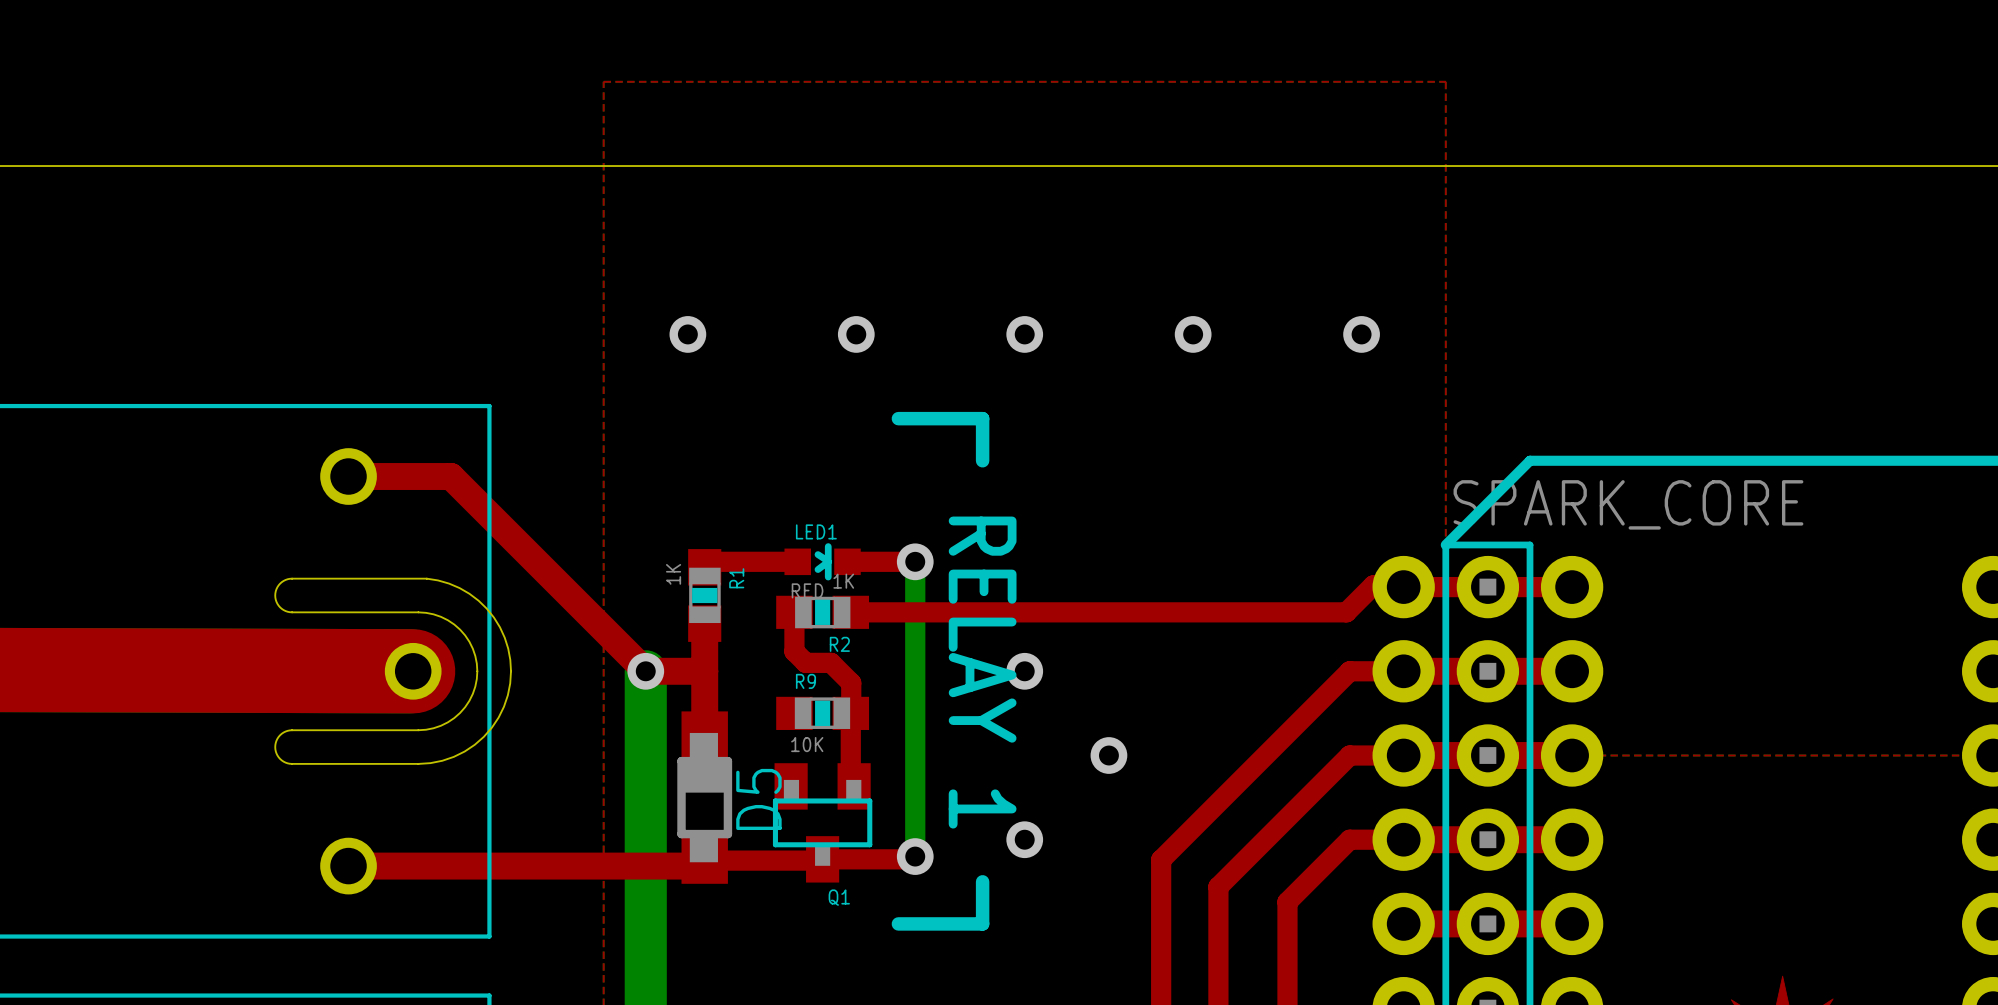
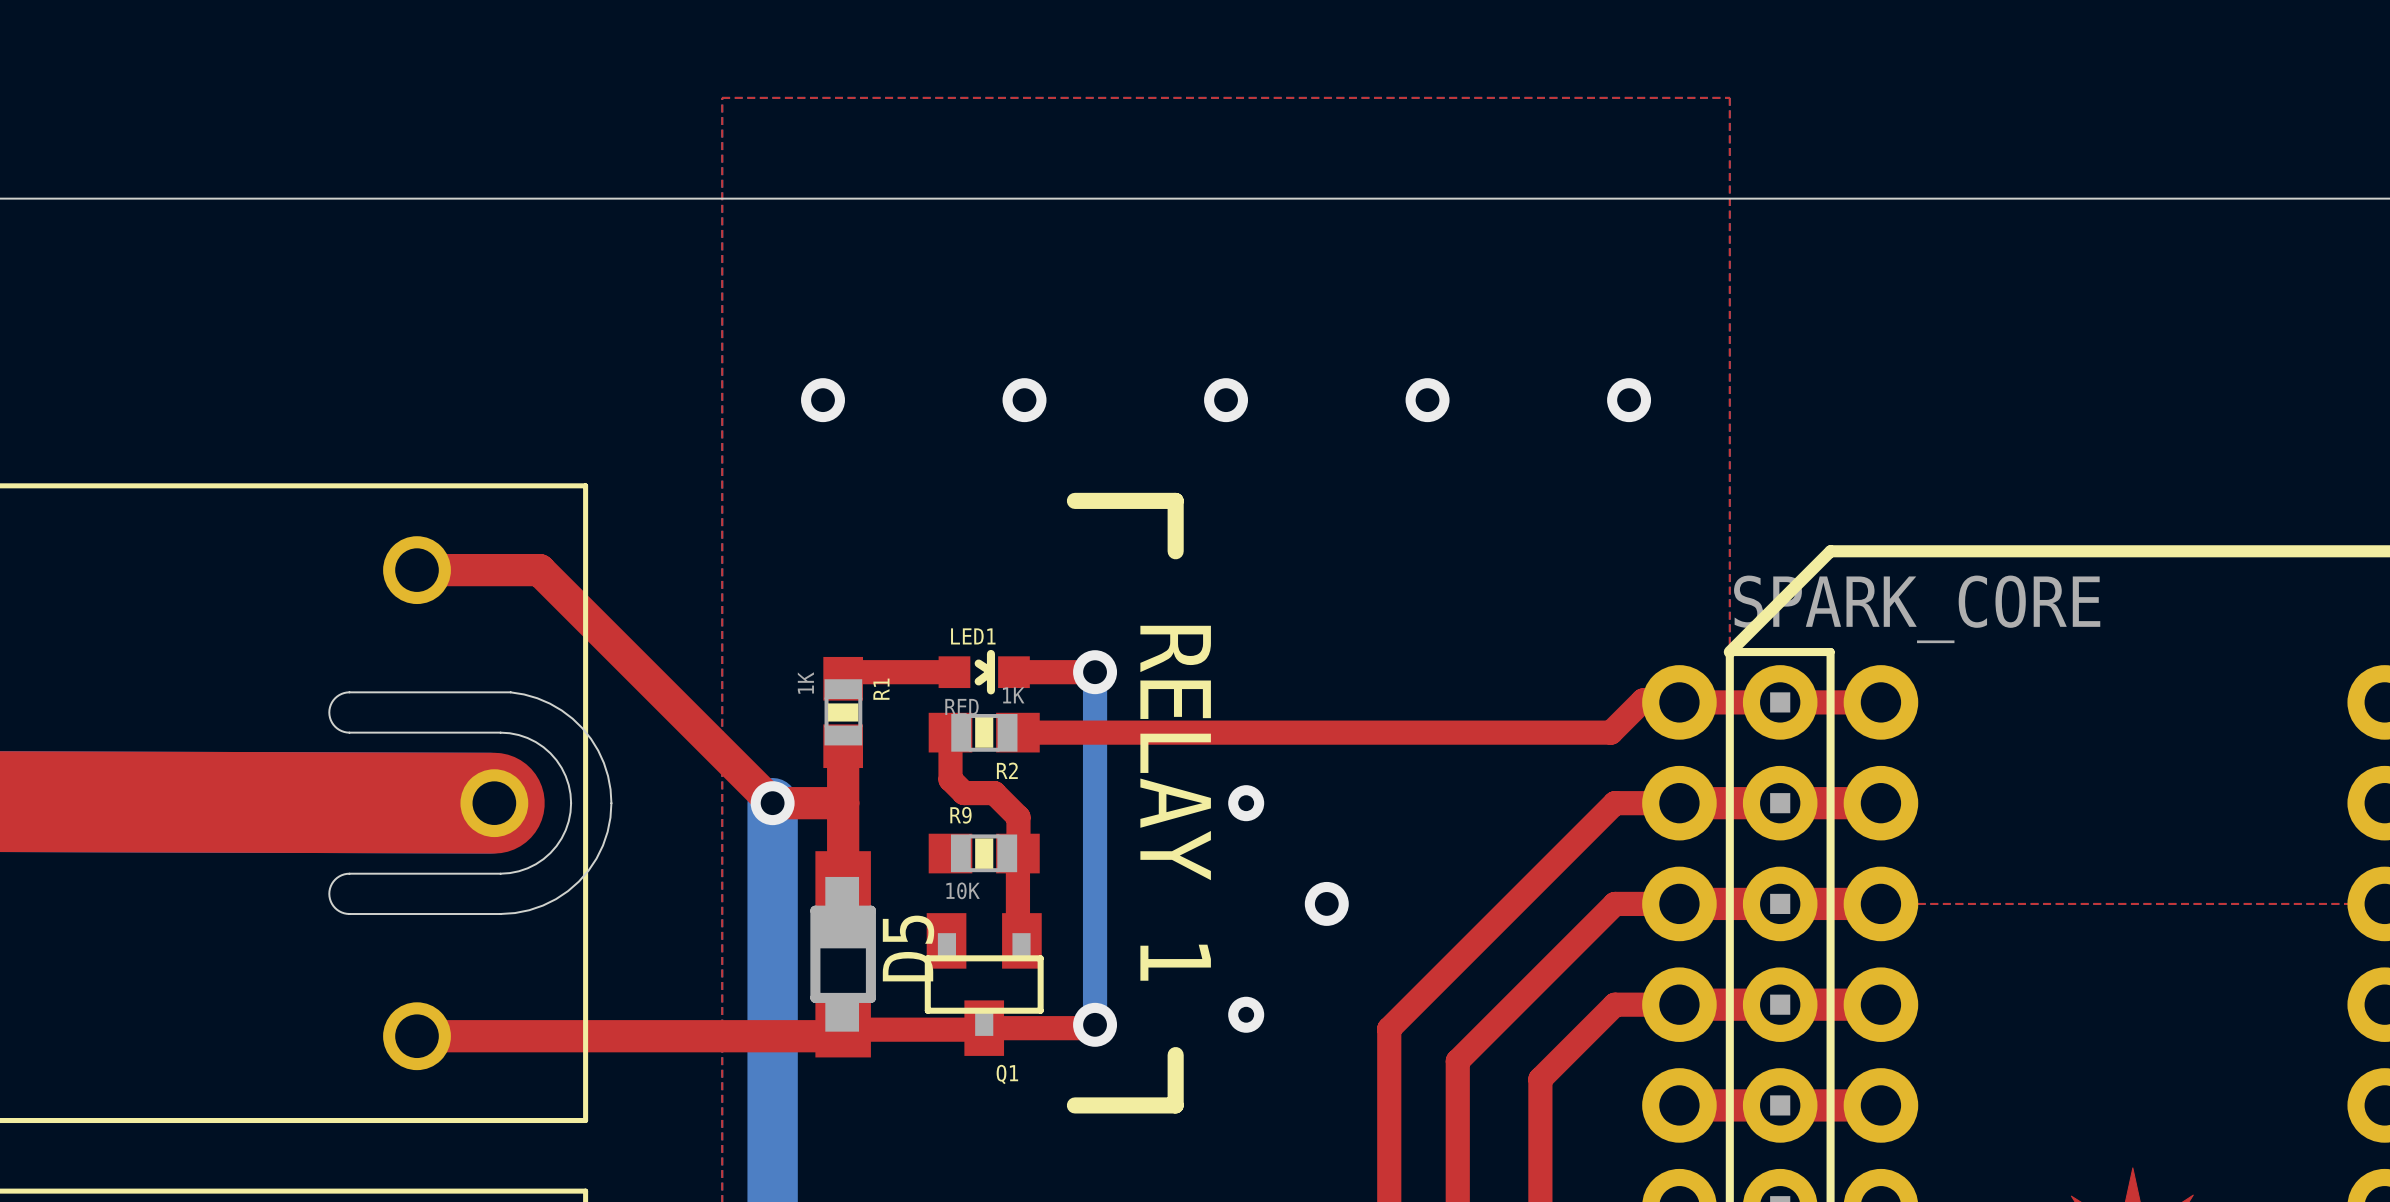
via position: (1024, 671) -> (1246, 803)
via position: (1024, 839) -> (1246, 1014)

